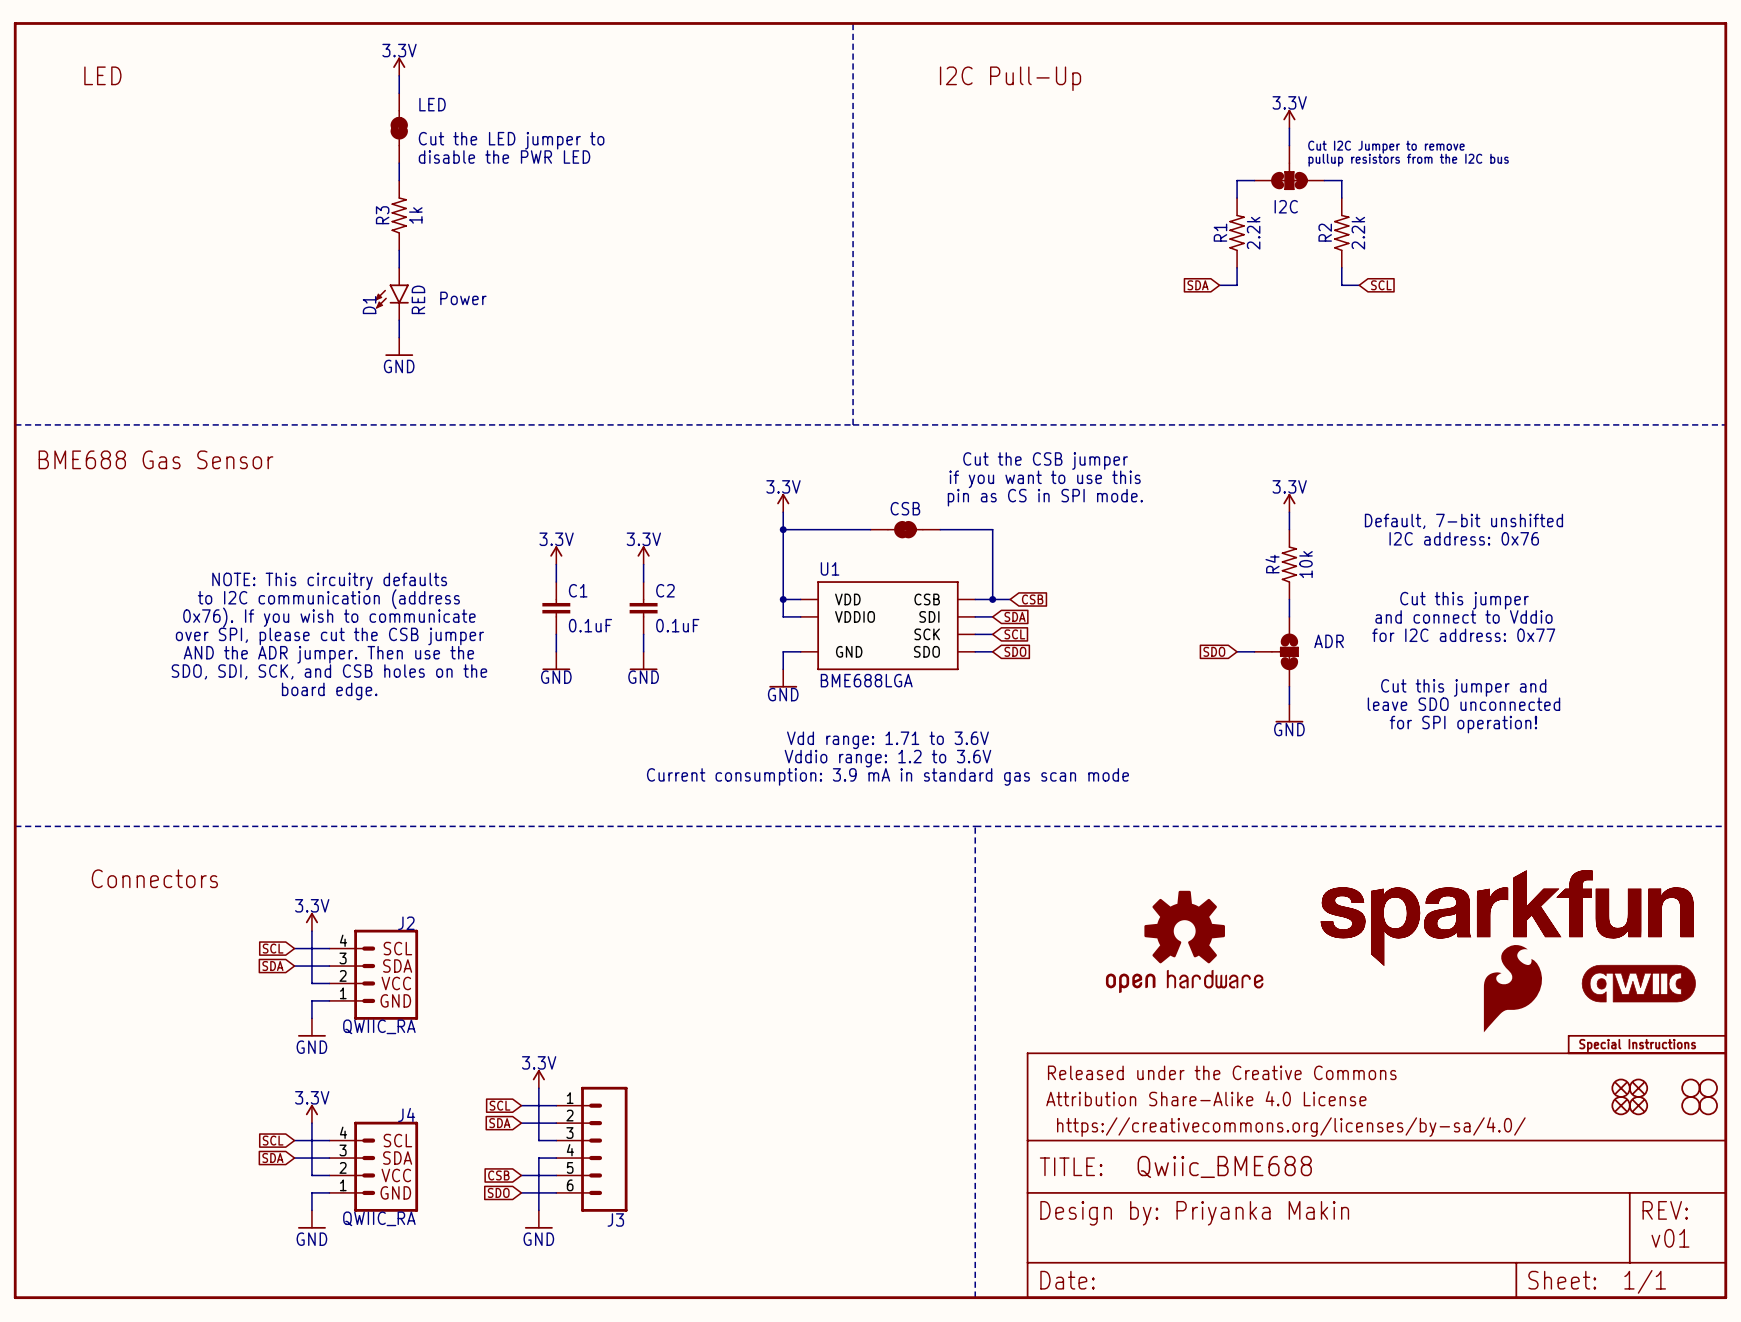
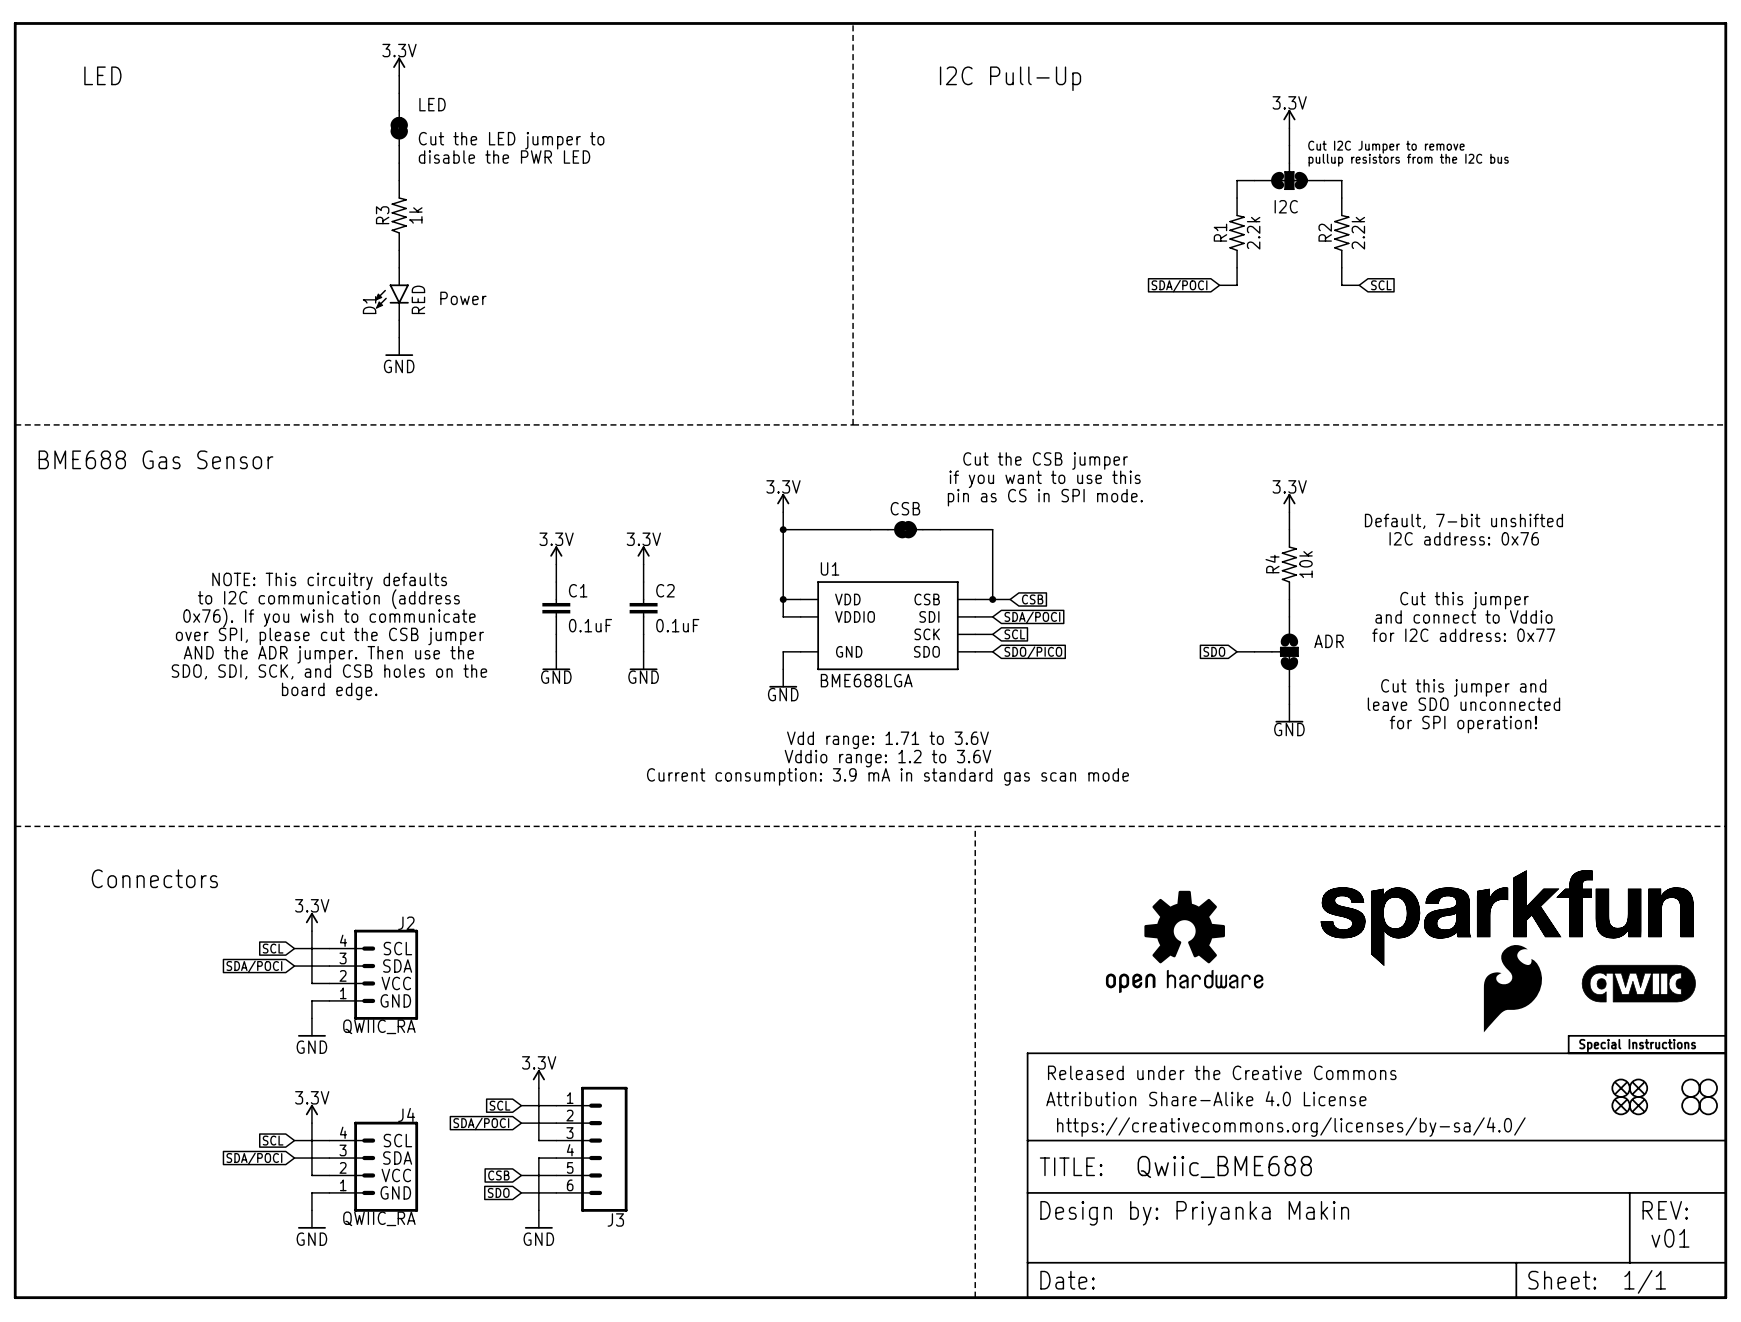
global label: SDA (1198, 285) -> SDA/POCI (1179, 286)
global label: SDA (1015, 616) -> SDA/POCI (1032, 617)
global label: SDO (1015, 651) -> SDO/PICO (1033, 652)
global label: SDA (272, 966) -> SDA/POCI (254, 966)
global label: SDA (499, 1123) -> SDA/POCI (481, 1123)
global label: SDA (272, 1158) -> SDA/POCI (254, 1158)

